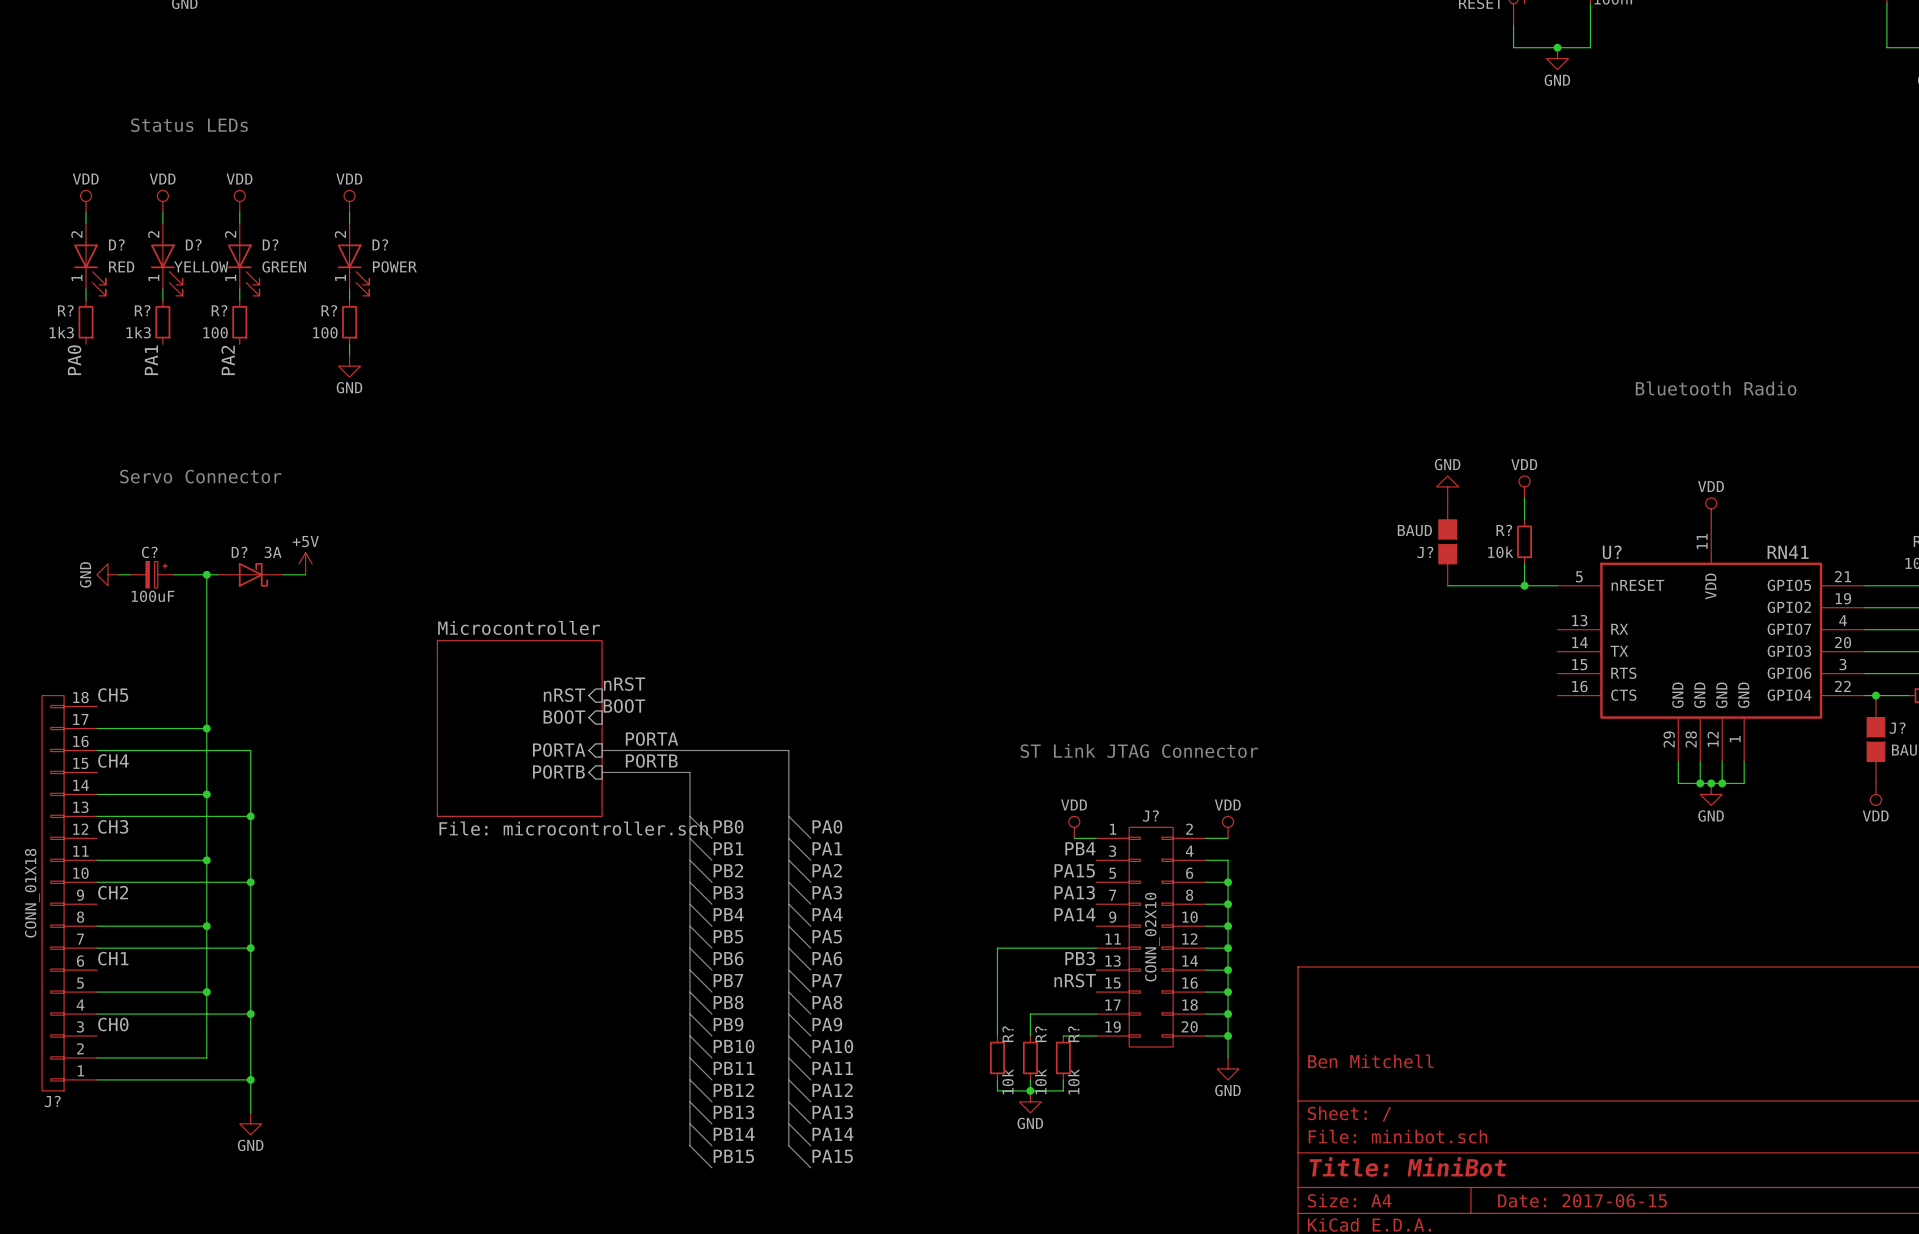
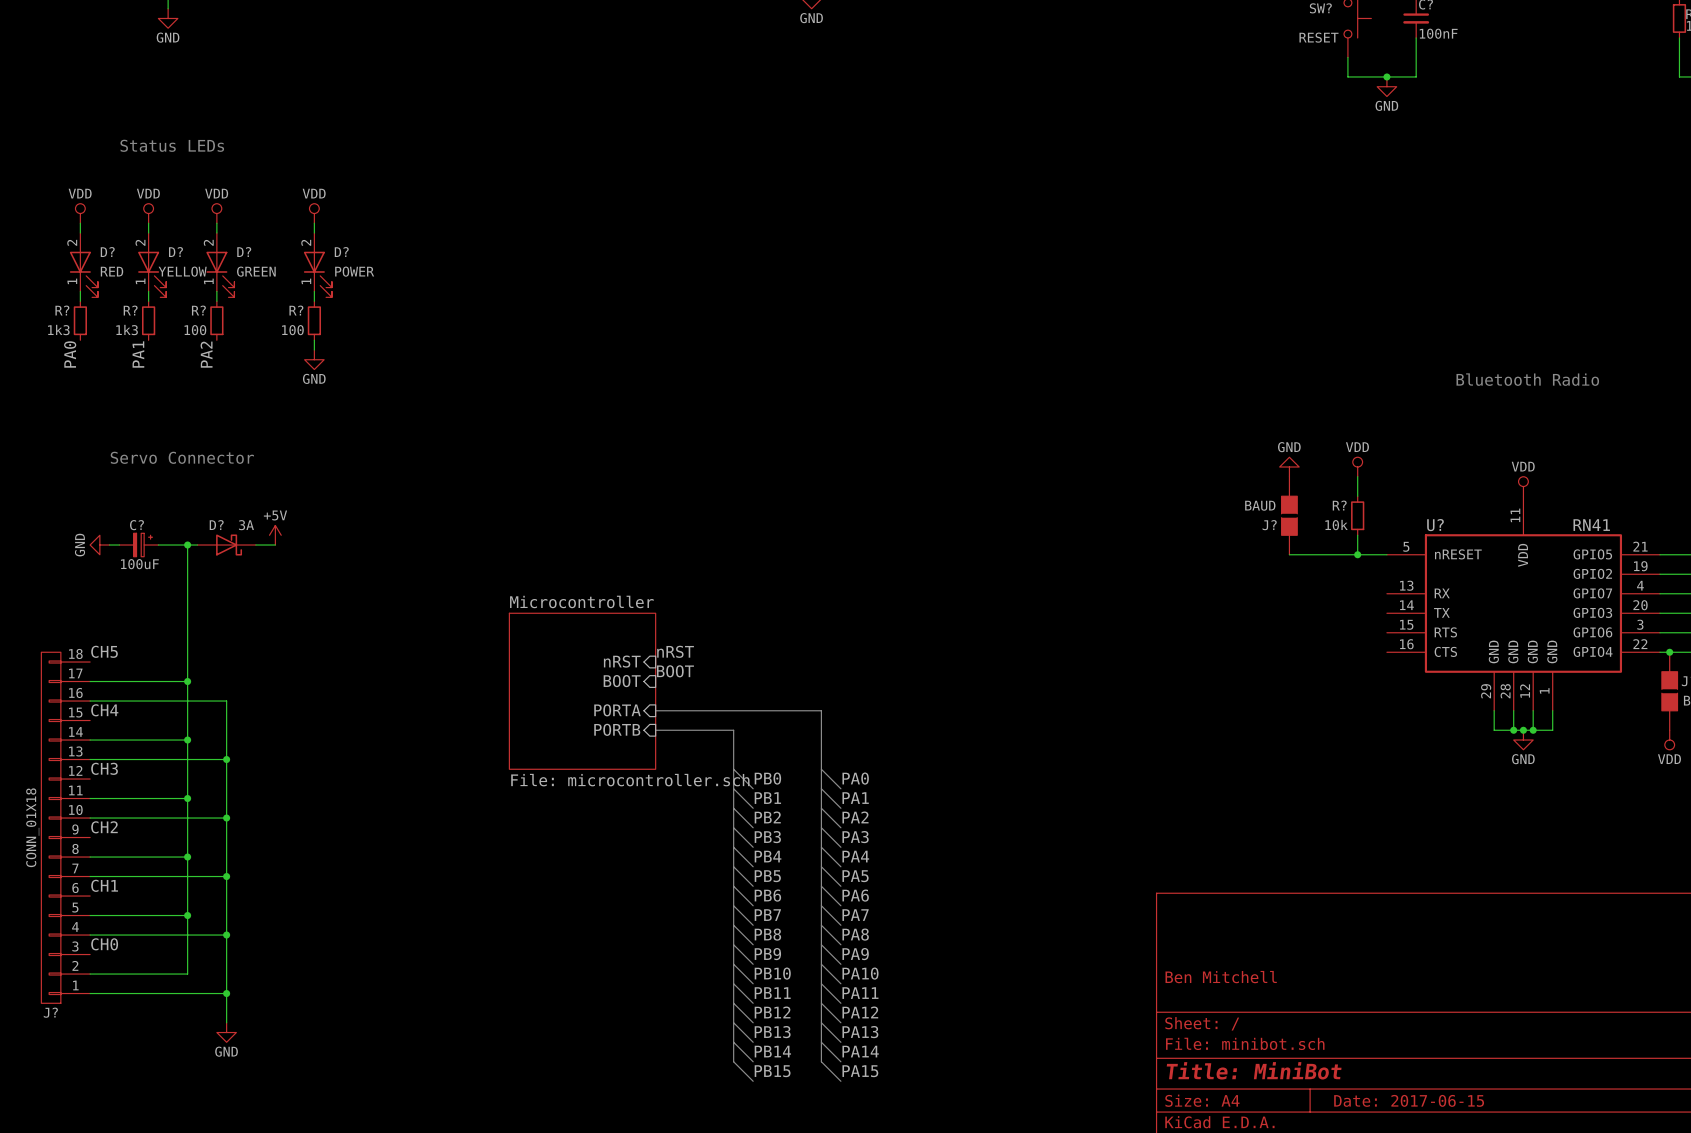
label position: nRST (624, 684) -> nRST (675, 651)
sheet pin position: nRST (564, 695) -> nRST (622, 661)
label position: BOOT (624, 706) -> BOOT (675, 671)
sheet pin position: BOOT (564, 717) -> BOOT (622, 681)
sheet Microcontroller position: (519, 728) -> (582, 691)
label: PORTA (652, 739) -> none
sheet pin position: PORTA (559, 750) -> PORTA (617, 710)
bus: (602, 750) (788, 750) (788, 1145) (810, 1167) -> (655, 710) (821, 710) (821, 1061) (840, 1081)
text: ST Link JTAG Connector (1139, 750) -> none
label: PORTB (651, 760) -> none
sheet pin position: PORTB (558, 771) -> PORTB (617, 729)
bus: (602, 772) (689, 772) (689, 1145) (711, 1167) -> (655, 730) (733, 730) (733, 1061) (753, 1081)
bus: (689, 816) (711, 838) -> (733, 769) (753, 788)
bus: (788, 816) (810, 838) -> (821, 769) (840, 788)
label position: PB0 (728, 826) -> PB0 (767, 778)
label position: PA0 (827, 826) -> PA0 (855, 778)
power symbol: VDD (1074, 827) -> none
power symbol: VDD (1228, 827) -> none
bus: (689, 838) (711, 860) -> (733, 788) (753, 808)
bus: (788, 838) (810, 860) -> (821, 788) (840, 808)
wire: (1074, 838) (1096, 838) -> none
wire: (1206, 838) (1228, 838) -> none
label position: PB1 (728, 848) -> PB1 (767, 798)
label position: PA1 (827, 848) -> PA1 (855, 798)
label: PB4 (1080, 848) -> none
bus: (689, 860) (711, 882) -> (733, 808) (753, 827)
bus: (788, 860) (810, 882) -> (821, 808) (840, 827)
wire: (1206, 860) (1228, 860) (1228, 1057) -> none
label position: PB2 (728, 870) -> PB2 (767, 817)
label position: PA2 (827, 870) -> PA2 (855, 817)
label: PA15 (1074, 870) -> none
bus: (689, 882) (711, 904) -> (733, 827) (753, 847)
bus: (788, 882) (810, 904) -> (821, 827) (840, 847)
wire: (1206, 882) (1228, 882) -> none
junction: (1228, 882) -> none
label: PB3 (728, 892) -> none
label position: PA3 (827, 892) -> PA3 (855, 837)
label: PA13 (1074, 892) -> none
label: none -> PB3 (767, 837)
bus: (689, 904) (711, 926) -> (733, 847) (753, 866)
bus: (788, 904) (810, 926) -> (821, 847) (840, 866)
wire: (1206, 904) (1228, 904) -> none
junction: (1228, 904) -> none
label: PB4 (728, 914) -> none
label position: PA4 (827, 914) -> PA4 (855, 856)
label: PA14 (1074, 914) -> none
label: none -> PB4 (768, 856)
bus: (689, 926) (711, 948) -> (733, 866) (753, 886)
bus: (788, 926) (810, 948) -> (821, 866) (840, 886)
wire: (1206, 926) (1228, 926) -> none
junction: (1228, 926) -> none
label position: PB5 (728, 936) -> PB5 (767, 876)
label position: PA5 (827, 936) -> PA5 (855, 876)
J?: CONN_02X10 (1151, 937) -> none
bus: (689, 948) (711, 970) -> (733, 886) (753, 905)
bus: (788, 948) (810, 970) -> (821, 886) (840, 905)
wire: (1096, 948) (997, 948) (997, 1036) -> none
wire: (1206, 948) (1228, 948) -> none
junction: (1228, 948) -> none
label position: PB6 (728, 958) -> PB6 (767, 895)
label position: PA6 (827, 958) -> PA6 (855, 895)
label: PB3 (1080, 958) -> none
bus: (689, 970) (711, 992) -> (733, 905) (753, 925)
bus: (788, 970) (810, 992) -> (821, 905) (840, 925)
wire: (1206, 970) (1228, 970) -> none
junction: (1228, 970) -> none
label position: PB7 (728, 980) -> PB7 (767, 915)
label position: PA7 (827, 980) -> PA7 (855, 915)
label: nRST (1075, 980) -> none
bus: (689, 992) (711, 1014) -> (733, 925) (753, 944)
bus: (788, 992) (810, 1014) -> (821, 925) (840, 944)
wire: (1206, 992) (1228, 992) -> none
junction: (1228, 992) -> none
label position: PB8 (728, 1002) -> PB8 (767, 934)
label position: PA8 (827, 1002) -> PA8 (855, 934)
bus: (689, 1014) (711, 1036) -> (733, 944) (753, 964)
bus: (788, 1014) (810, 1036) -> (821, 944) (840, 964)
wire: (1096, 1014) (1030, 1014) (1030, 1036) -> none
wire: (1206, 1014) (1228, 1014) -> none
junction: (1228, 1014) -> none
label position: PB9 (728, 1024) -> PB9 (767, 954)
label position: PA9 (827, 1024) -> PA9 (855, 954)
bus: (689, 1036) (711, 1057) -> (733, 964) (753, 983)
bus: (788, 1036) (810, 1057) -> (821, 964) (840, 983)
wire: (1063, 1036) (1096, 1036) -> none
wire: (1206, 1036) (1228, 1036) -> none
junction: (1228, 1036) -> none
label position: PB10 (733, 1046) -> PB10 (772, 973)
label position: PA10 (832, 1046) -> PA10 (860, 973)
bus: (689, 1057) (711, 1079) -> (733, 983) (753, 1003)
bus: (788, 1057) (810, 1079) -> (821, 983) (840, 1003)
R?: 10k (997, 1057) -> none
R?: 10k (1030, 1057) -> none
R?: 10k (1063, 1057) -> none
label position: PB11 (733, 1068) -> PB11 (772, 993)
label position: PA11 (832, 1068) -> PA11 (860, 993)
power symbol: GND (1228, 1068) -> none
bus: (689, 1079) (711, 1101) -> (733, 1003) (753, 1022)
bus: (788, 1079) (810, 1101) -> (821, 1003) (840, 1022)
wire: (997, 1079) (997, 1090) (1063, 1090) (1063, 1079) -> none
wire: (1030, 1079) (1030, 1090) -> none
label position: PB12 (733, 1090) -> PB12 (772, 1012)
label position: PA12 (832, 1090) -> PA12 (860, 1012)
junction: (1030, 1090) -> none
bus: (689, 1101) (711, 1123) -> (733, 1022) (753, 1042)
bus: (788, 1101) (810, 1123) -> (821, 1022) (840, 1042)
power symbol: GND (1030, 1101) -> none
label position: PB13 (733, 1112) -> PB13 (772, 1032)
label position: PA13 (832, 1112) -> PA13 (860, 1032)
bus: (689, 1123) (711, 1145) -> (733, 1042) (753, 1061)
bus: (788, 1123) (810, 1145) -> (821, 1042) (840, 1061)
label position: PB14 (734, 1134) -> PB14 (772, 1051)
label position: PA14 (832, 1134) -> PA14 (860, 1051)
label position: PB15 (733, 1156) -> PB15 (772, 1071)
label position: PA15 (832, 1156) -> PA15 (860, 1071)

